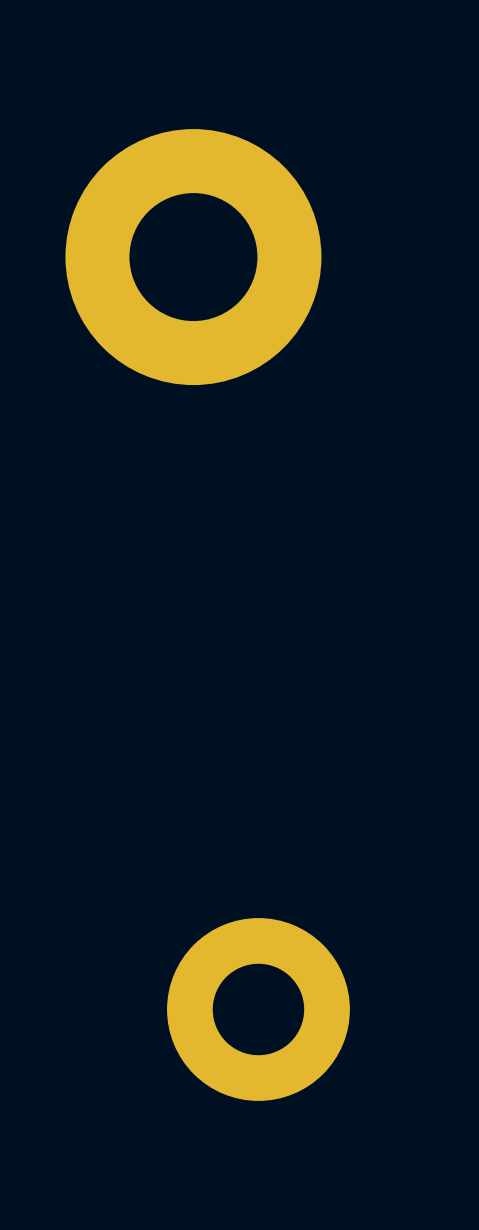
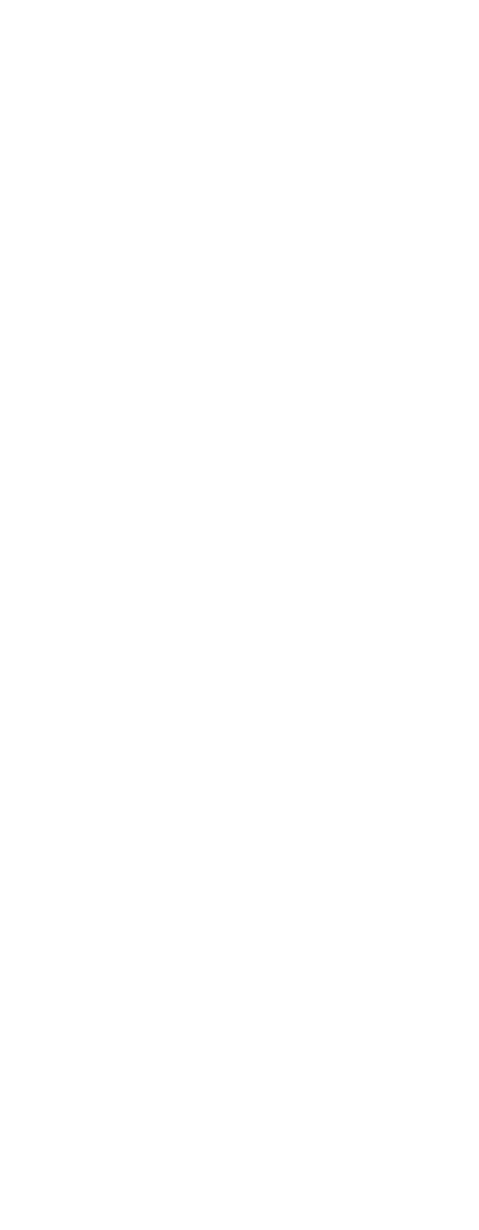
part: (193, 257) -> none
part: (258, 1009) -> none

